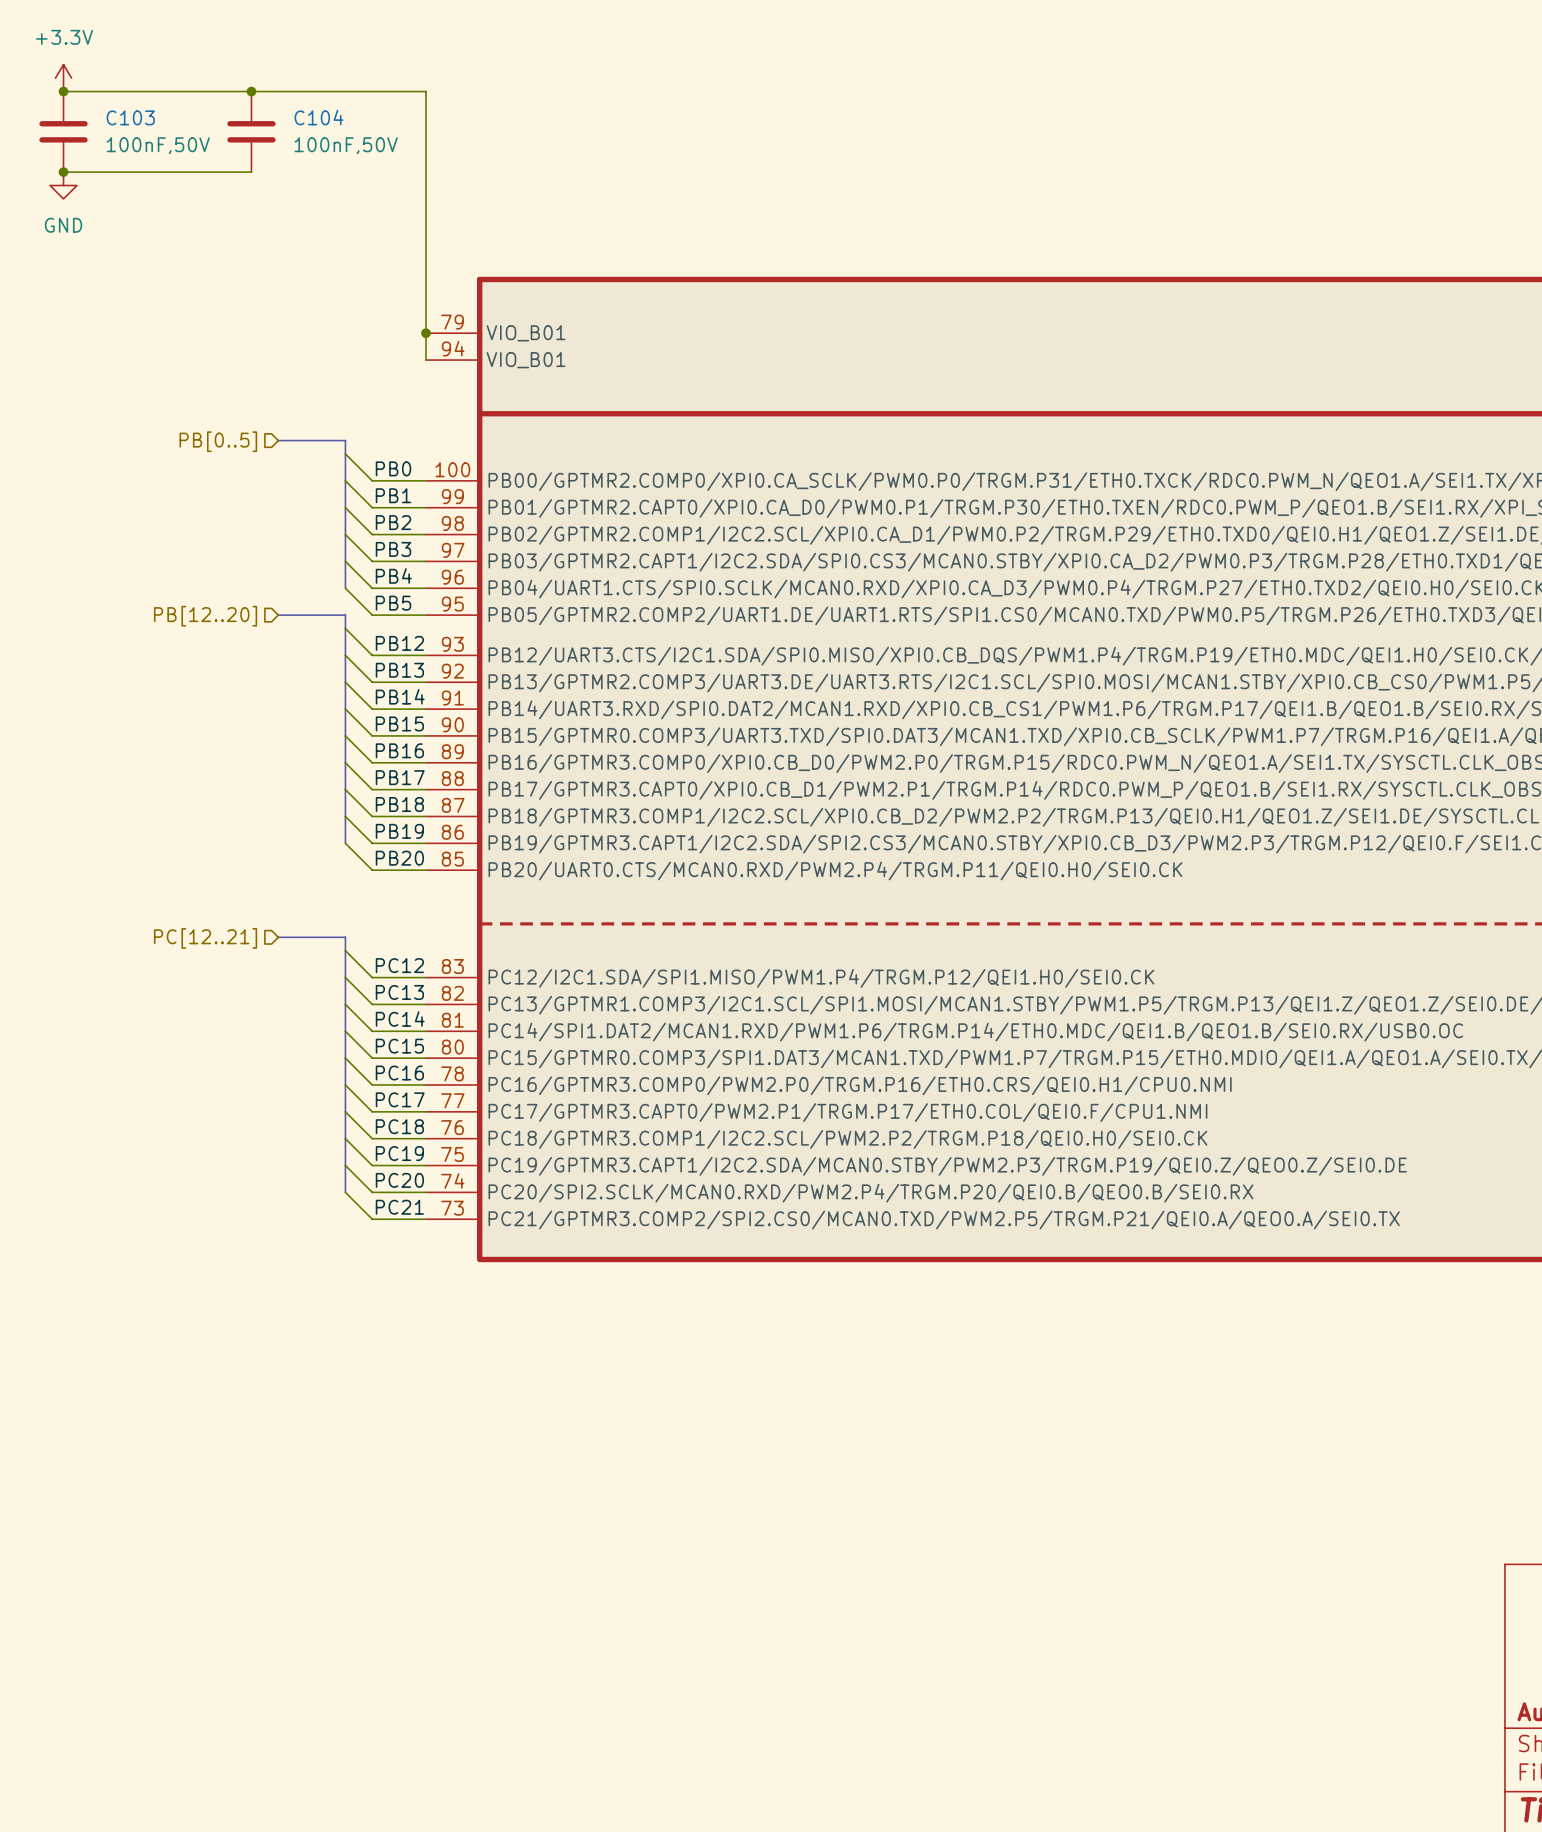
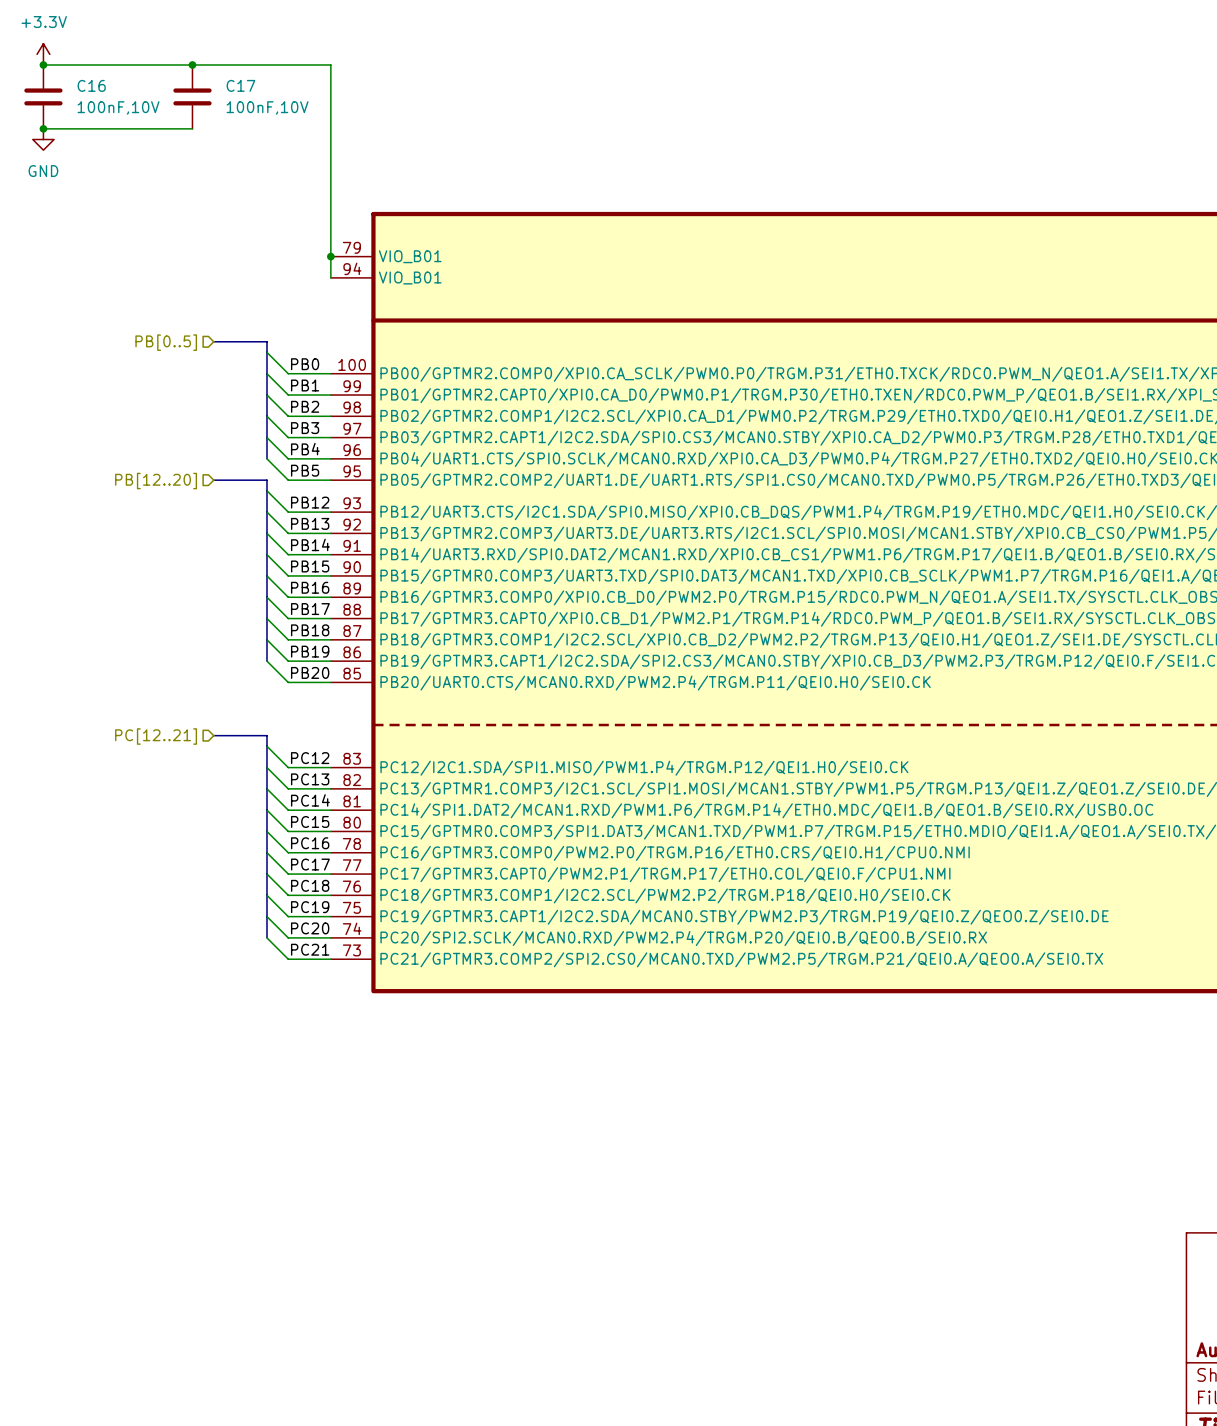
C103 name: C103 (130, 117) -> C16 (91, 85)
C104 name: C104 (319, 117) -> C17 (240, 85)
C103 value: 100nF,50V (158, 145) -> 100nF,10V (118, 107)
C104 value: 100nF,50V (346, 145) -> 100nF,10V (267, 107)

